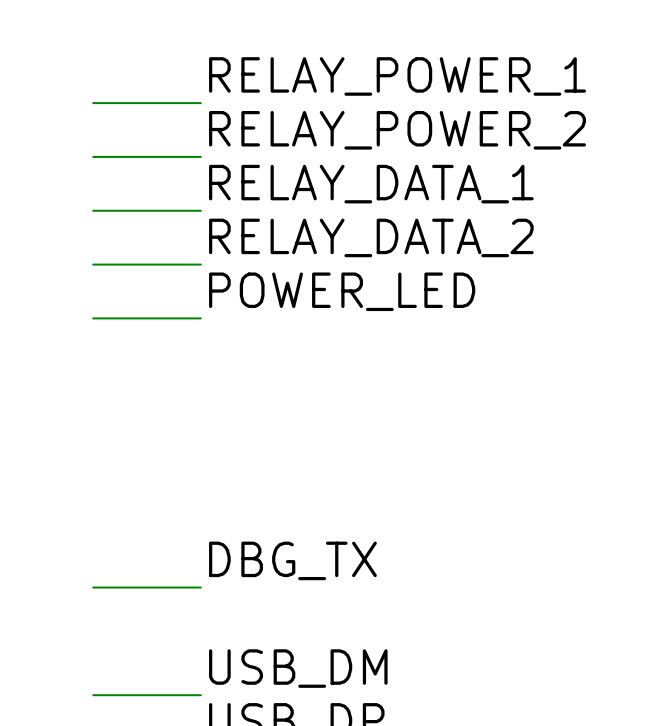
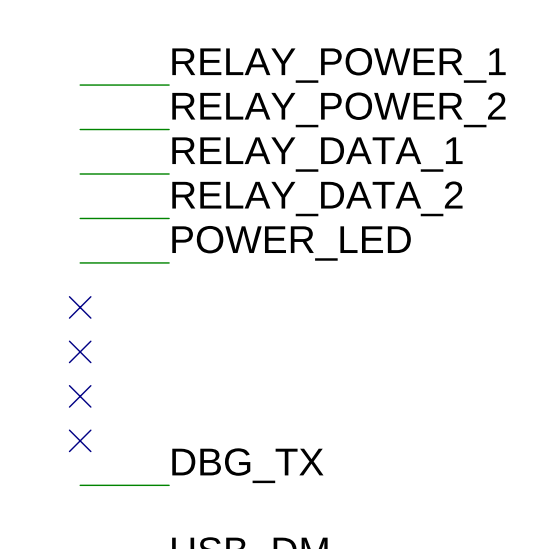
no-connect mark: none -> (80, 307)
no-connect mark: none -> (80, 351)
no-connect mark: none -> (80, 396)
no-connect mark: none -> (80, 440)

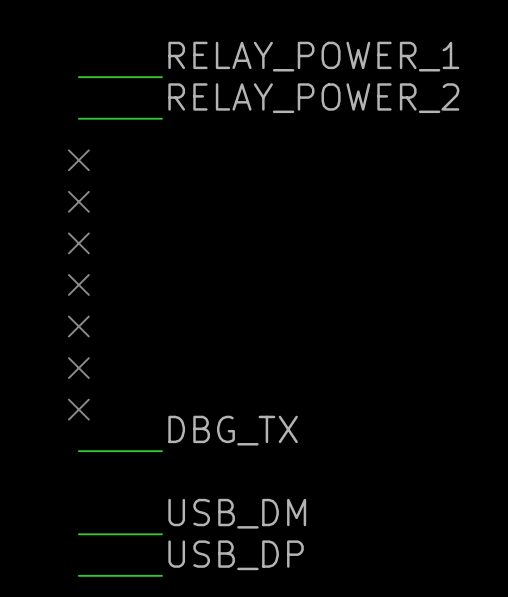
label: RELAY_DATA_1 (317, 154) -> none
wire: (80, 174) (169, 174) -> none
no-connect mark: none -> (78, 160)
label: RELAY_DATA_2 (317, 198) -> none
wire: (80, 218) (169, 218) -> none
no-connect mark: none -> (78, 201)
label: POWER_LED (291, 243) -> none
wire: (80, 262) (169, 262) -> none
no-connect mark: none -> (78, 243)

